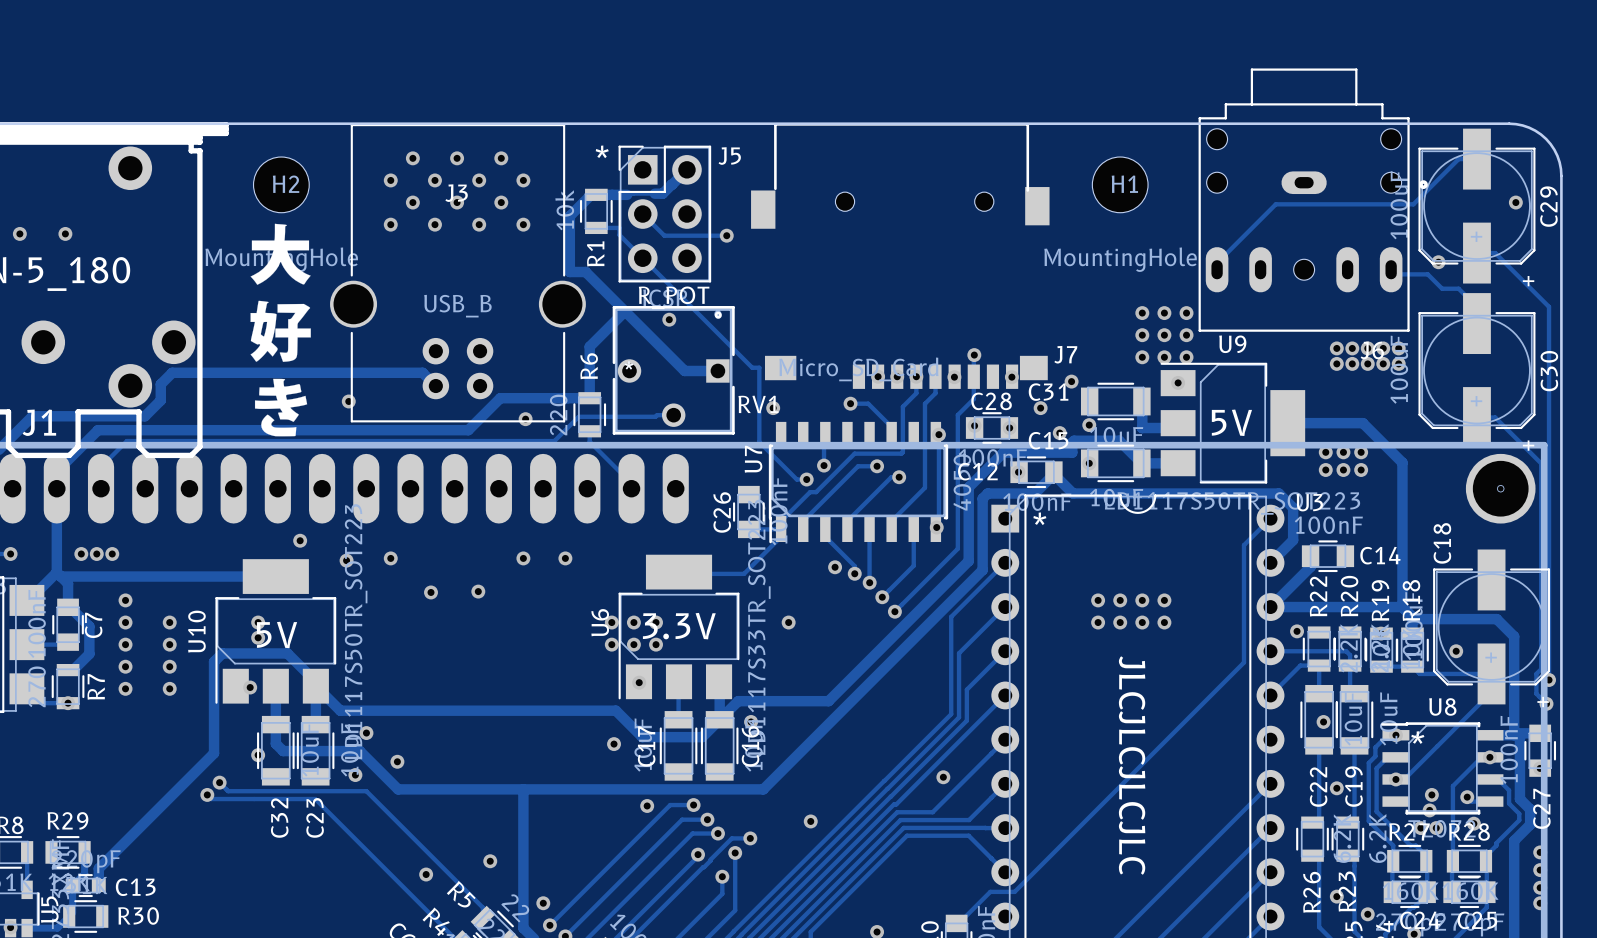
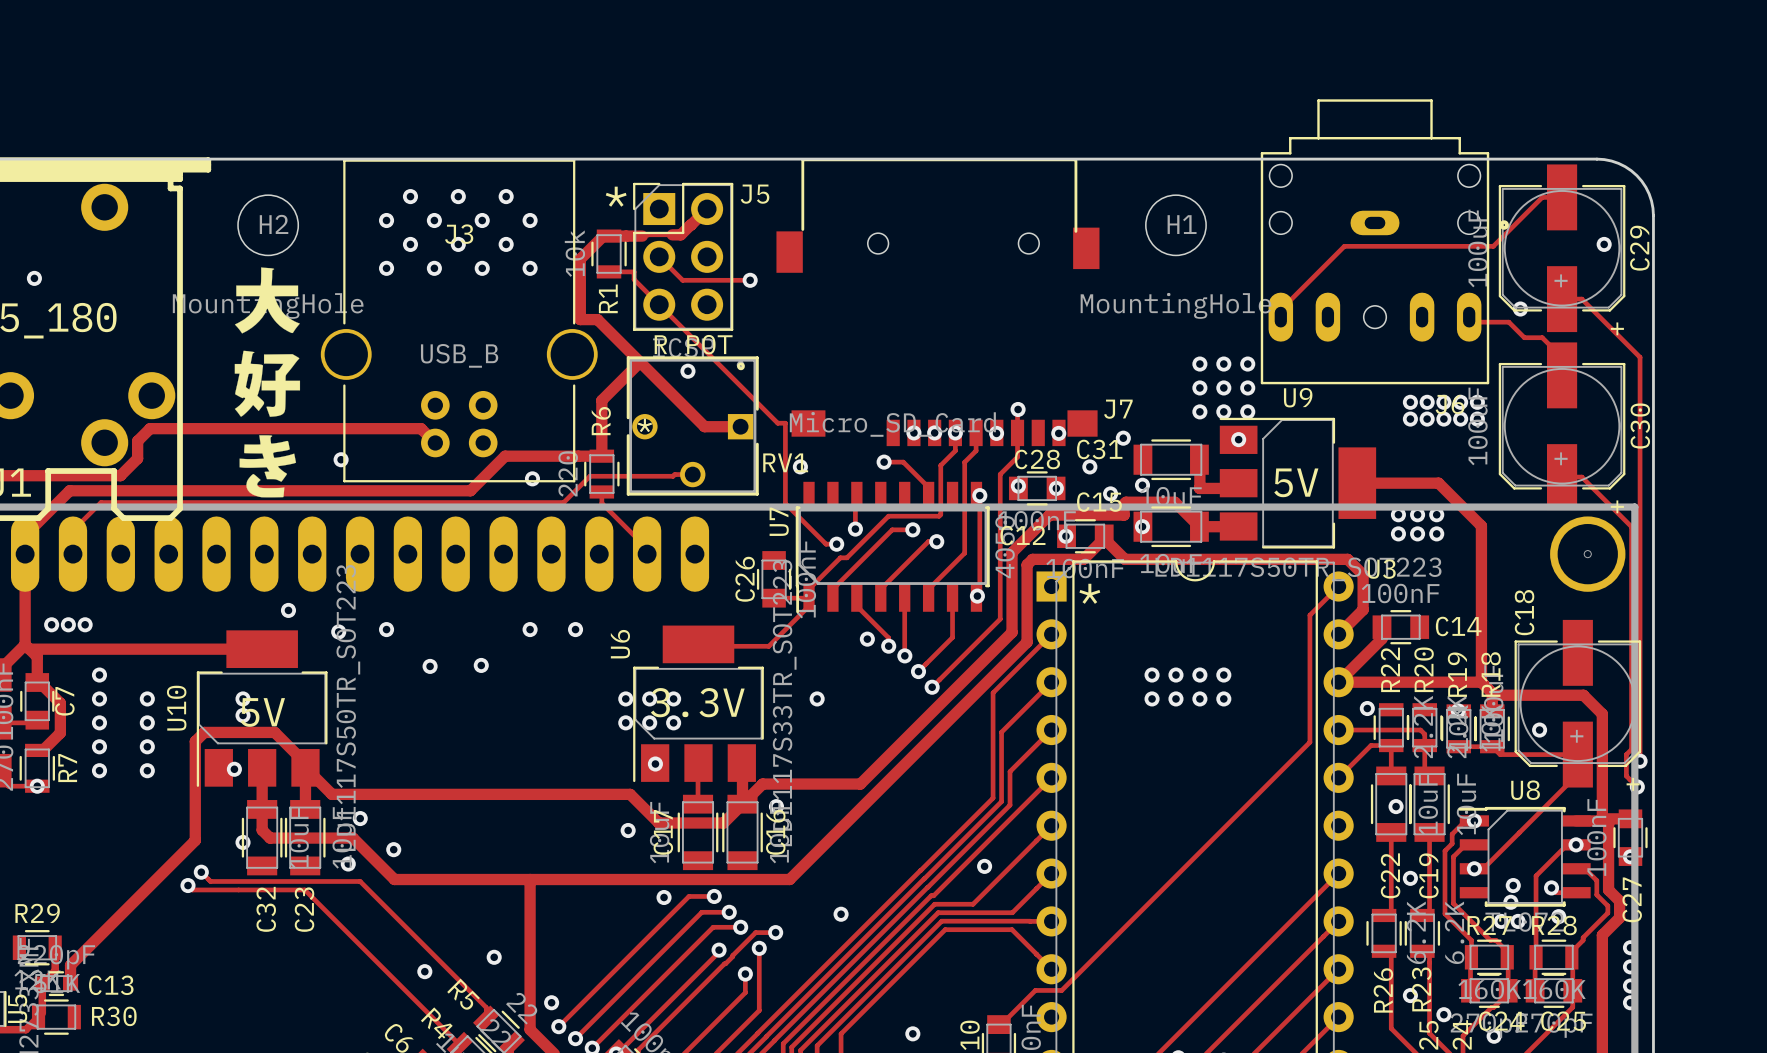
U6 name position: U6 (600, 622) -> U6 (620, 644)
text: * (1417, 737) -> none
text: JLCJLCJLCJLC (1132, 765) -> none

